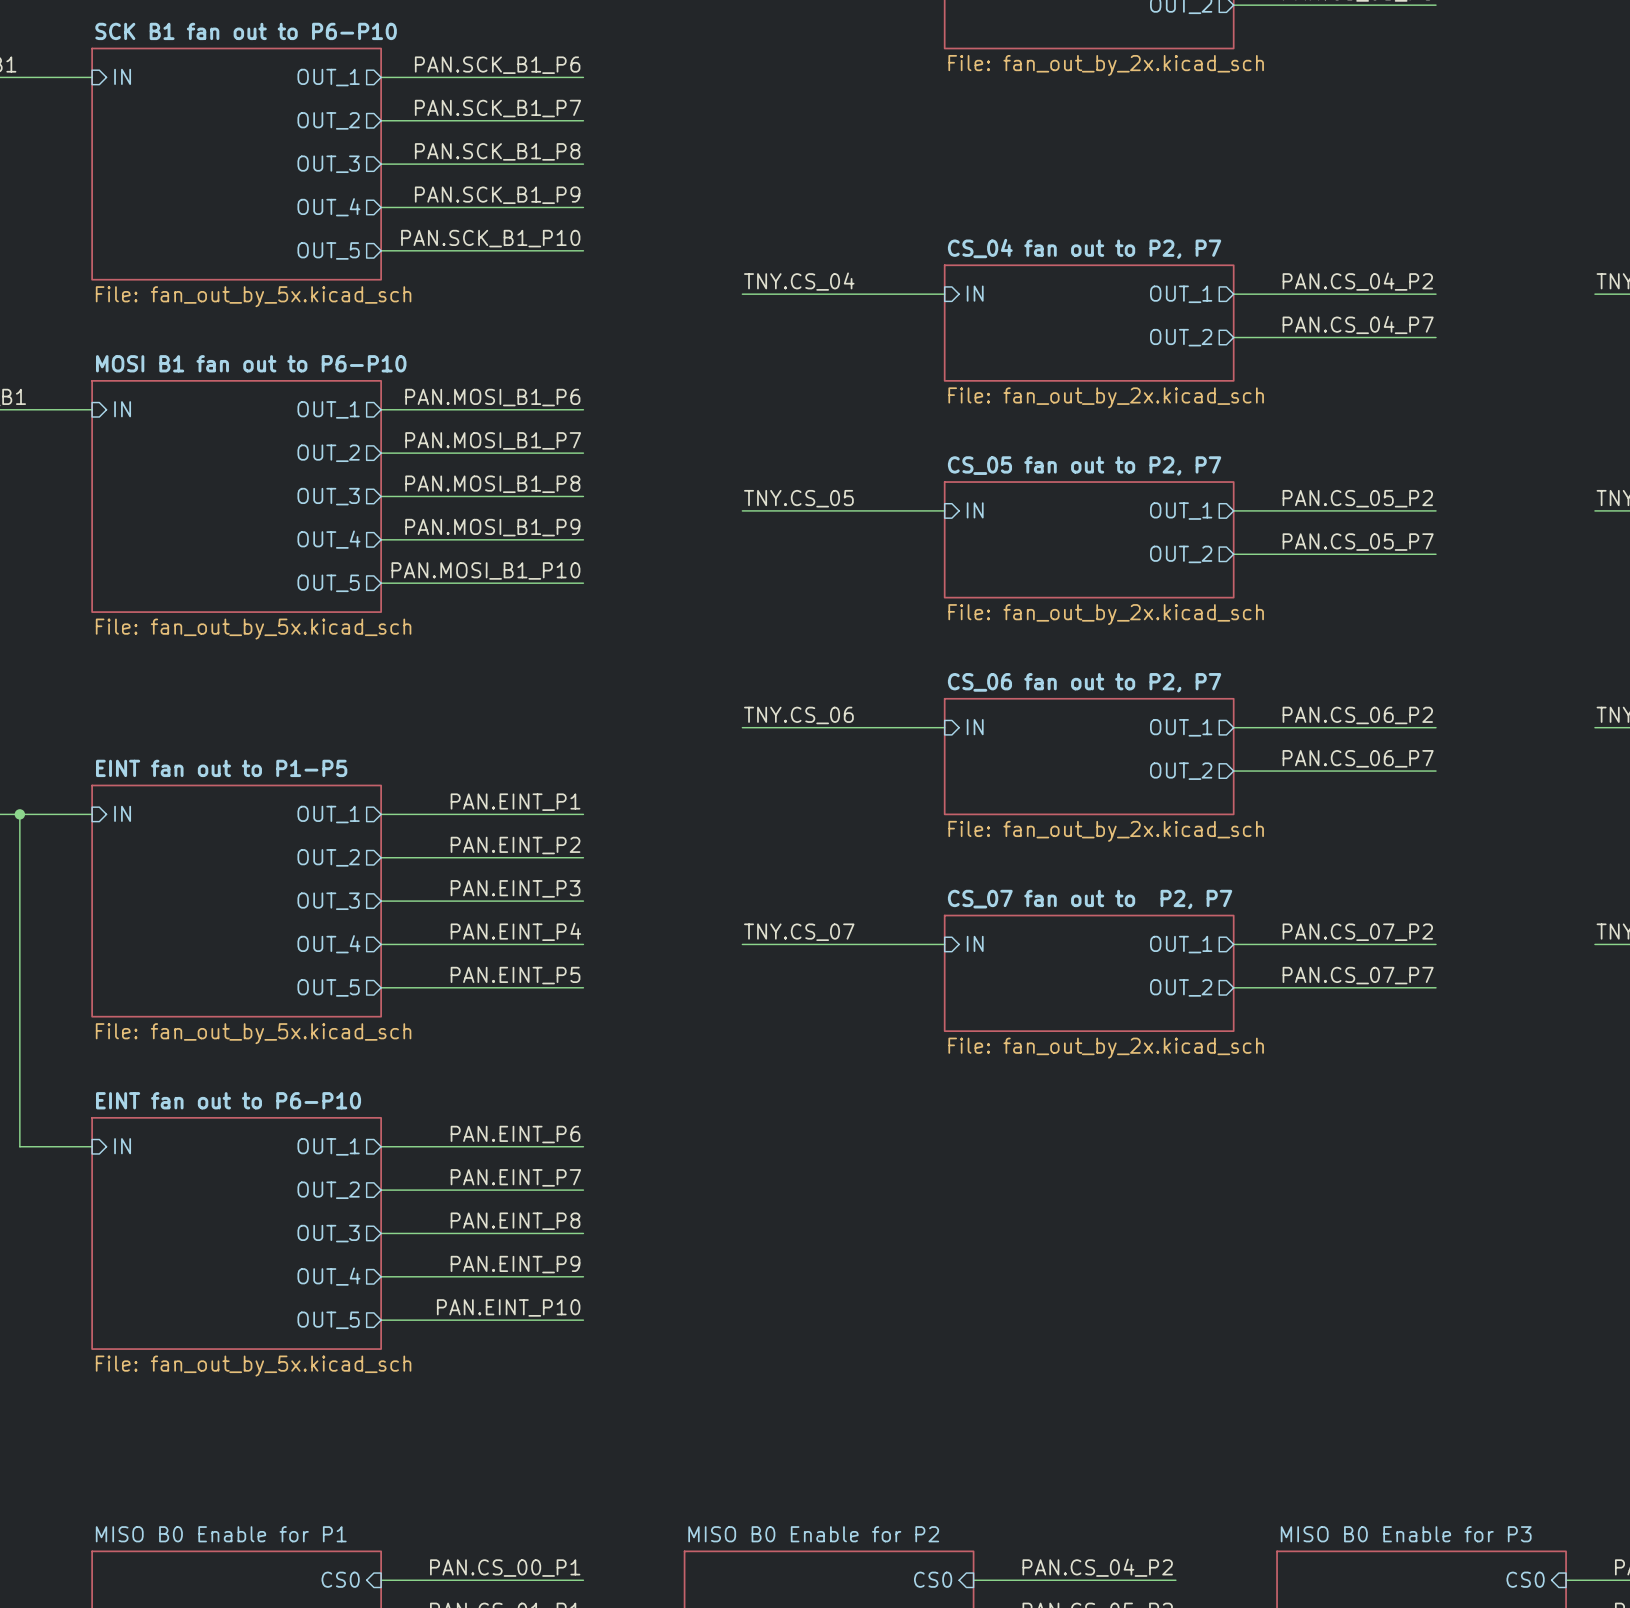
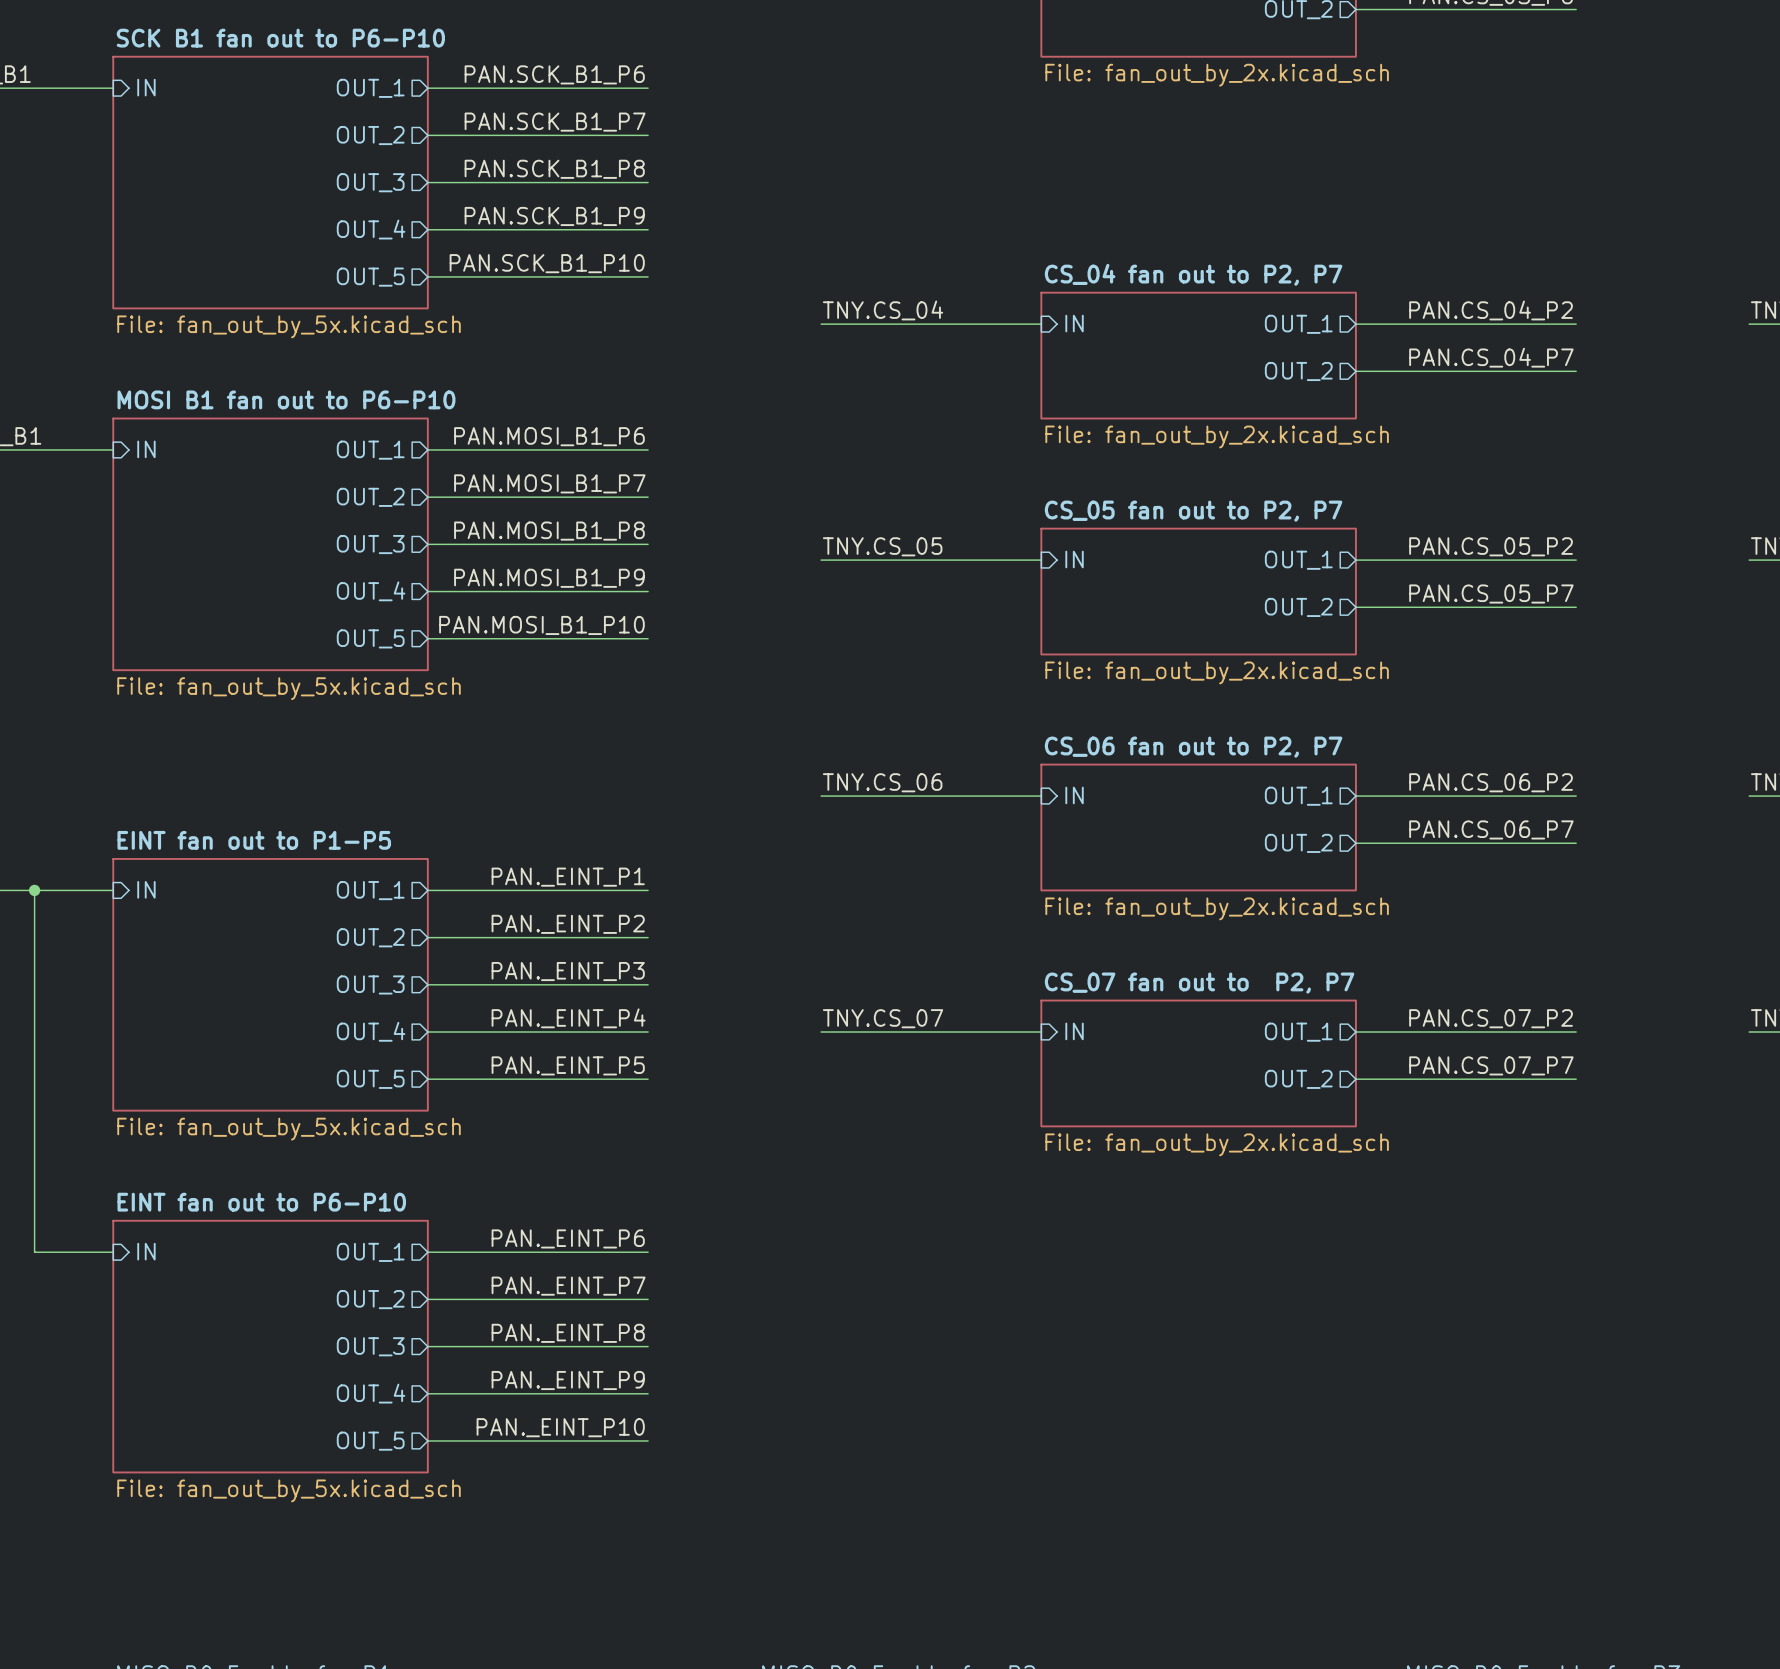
label: PAN.EINT_P1 (515, 802) -> PAN._EINT_P1 (568, 877)
label: PAN.EINT_P2 (515, 845) -> PAN._EINT_P2 (568, 924)
label: PAN.EINT_P3 (515, 888) -> PAN._EINT_P3 (568, 971)
label: PAN.EINT_P4 (515, 931) -> PAN._EINT_P4 (568, 1018)
label: PAN.EINT_P5 (515, 975) -> PAN._EINT_P5 (568, 1065)
label: PAN.EINT_P6 (515, 1134) -> PAN._EINT_P6 (568, 1238)
label: PAN.EINT_P7 (515, 1177) -> PAN._EINT_P7 (568, 1286)
label: PAN.EINT_P8 (515, 1221) -> PAN._EINT_P8 (568, 1333)
label: PAN.EINT_P9 (515, 1264) -> PAN._EINT_P9 (568, 1380)
label: PAN.EINT_P10 (508, 1307) -> PAN._EINT_P10 (560, 1427)

